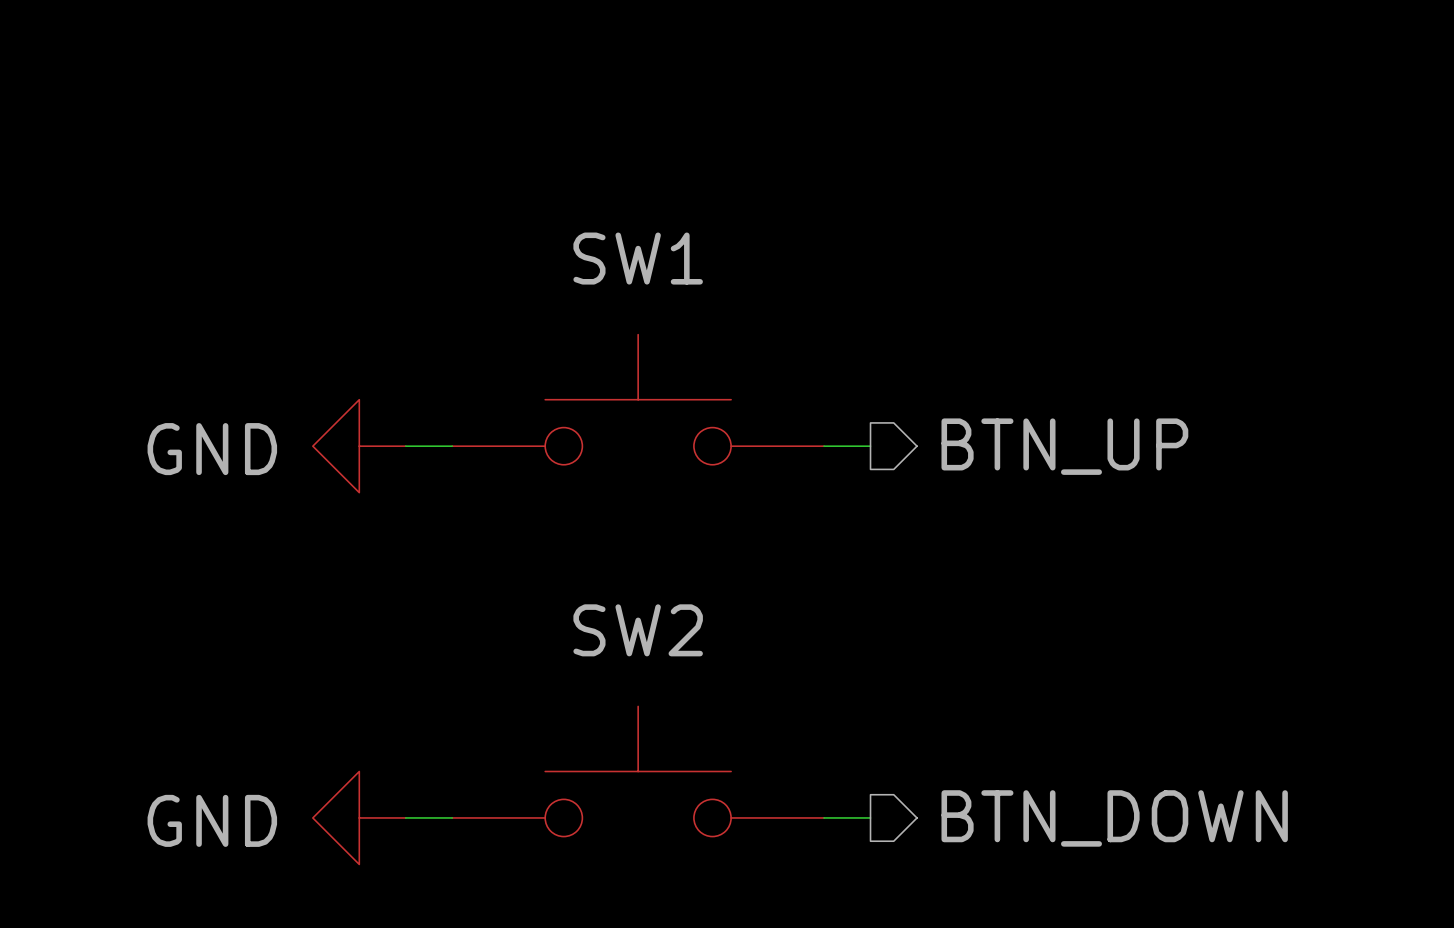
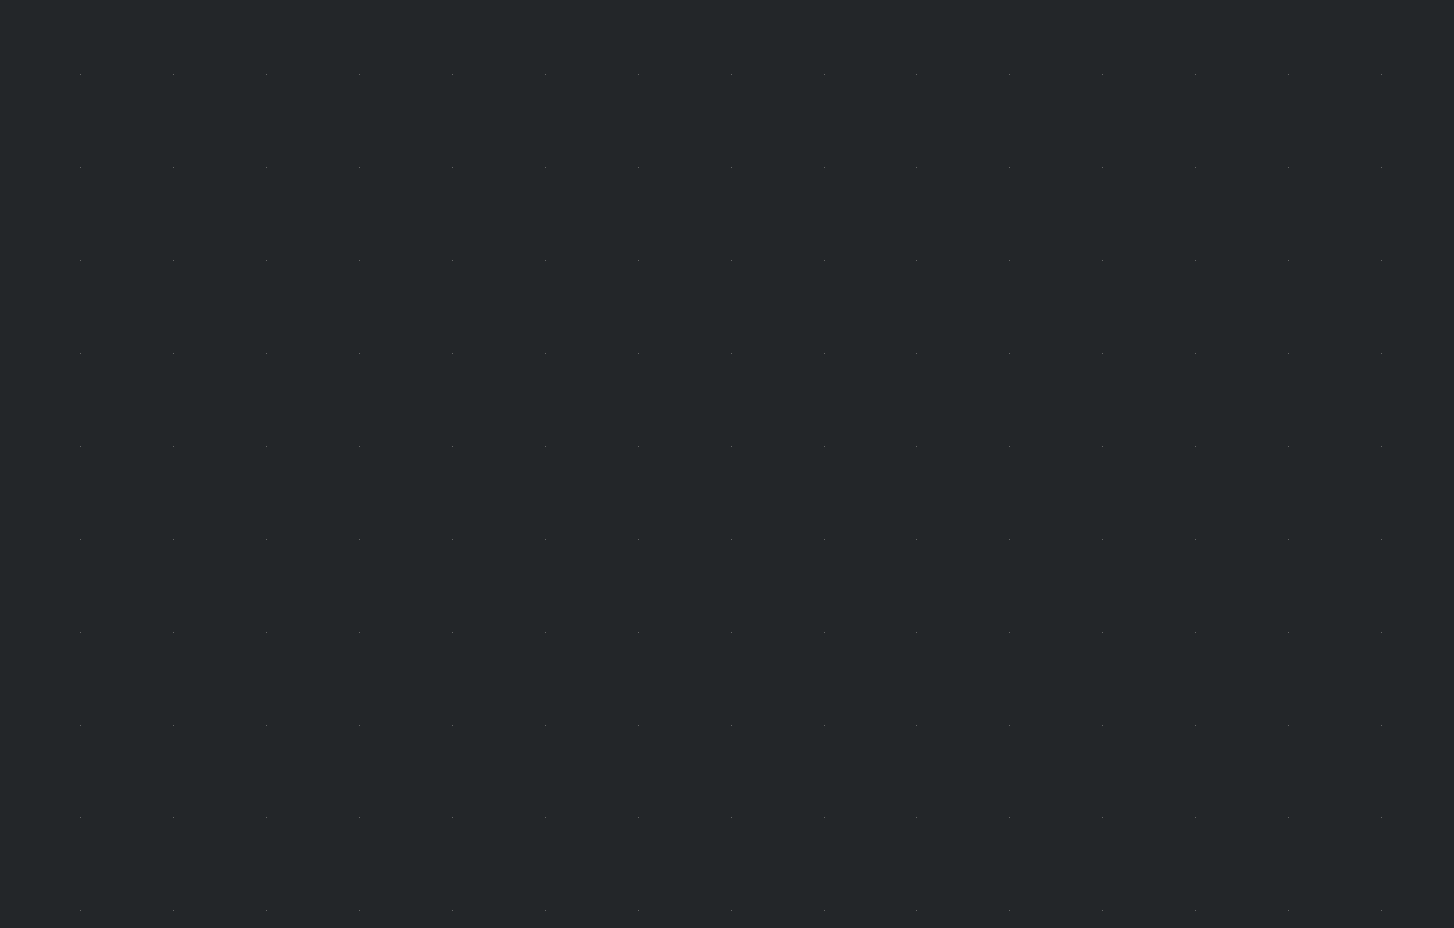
SW1: (638, 399) -> none
power symbol: GND (359, 446) -> none
wire: (405, 446) (452, 446) -> none
wire: (824, 446) (870, 446) -> none
hierarchical label: BTN_UP (1064, 446) -> none
SW2: (638, 771) -> none
power symbol: GND (359, 817) -> none
wire: (405, 817) (452, 817) -> none
wire: (824, 817) (870, 817) -> none
hierarchical label: BTN_DOWN (1114, 818) -> none

